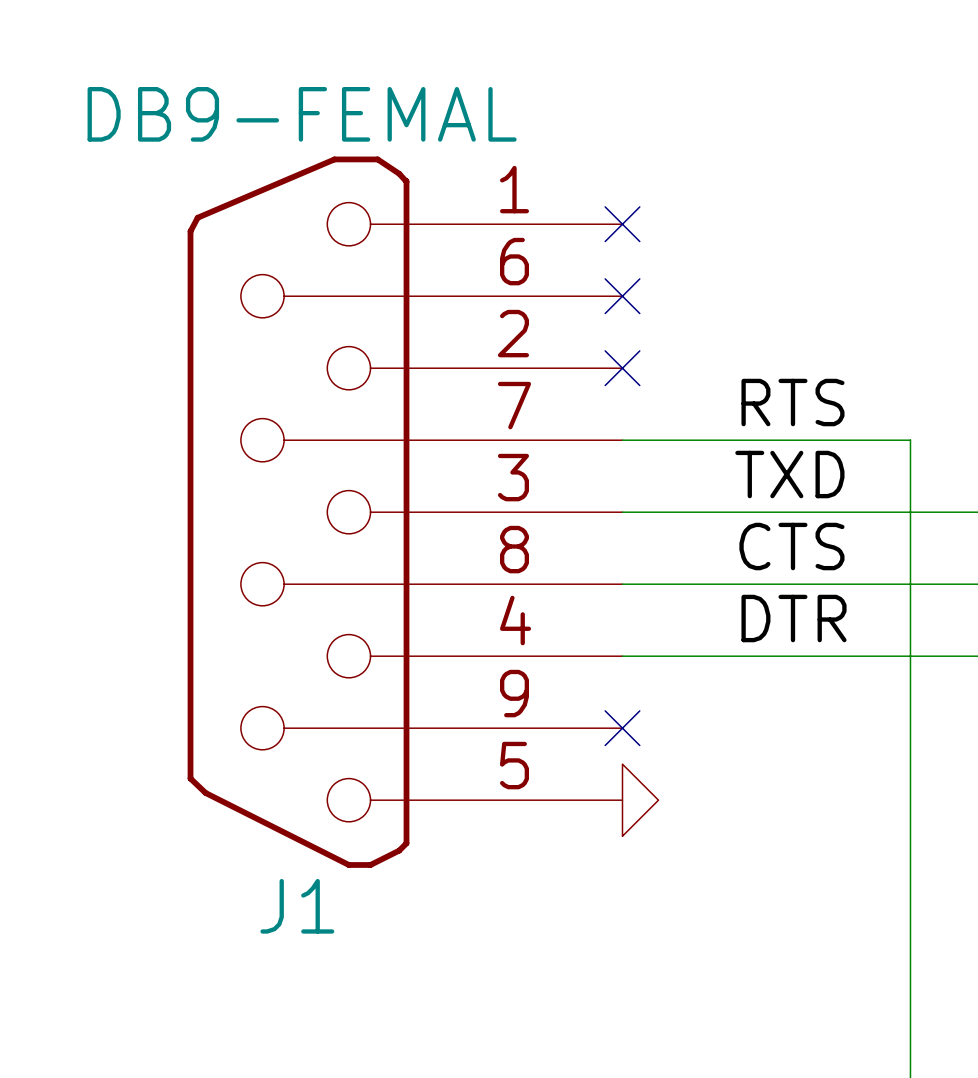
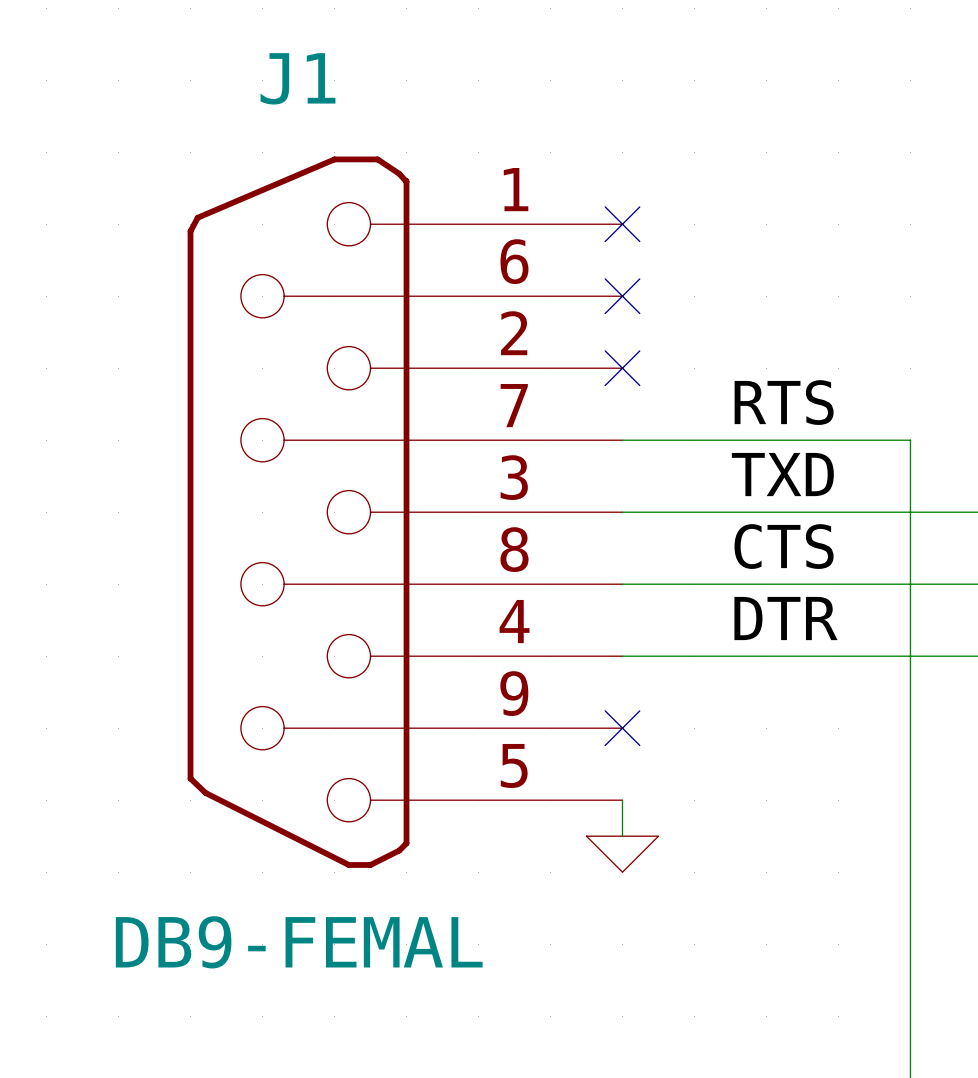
J1 value position: DB9-FEMAL (302, 114) -> DB9-FEMAL (299, 942)
power symbol rotation: 0° (640, 800) -> 90° clockwise (622, 854)
power symbol position: (640, 800) -> (622, 854)
J1 name position: J1 (297, 906) -> J1 (298, 78)

